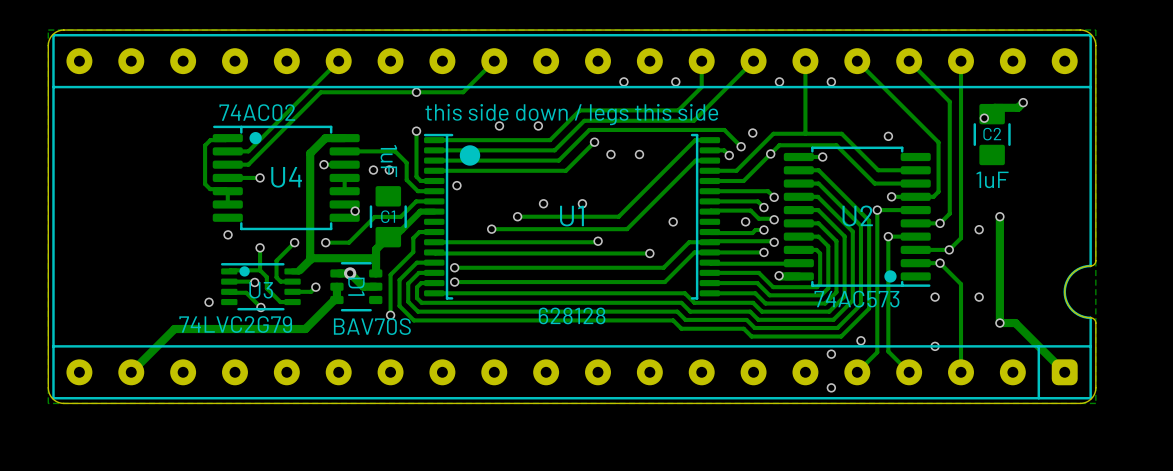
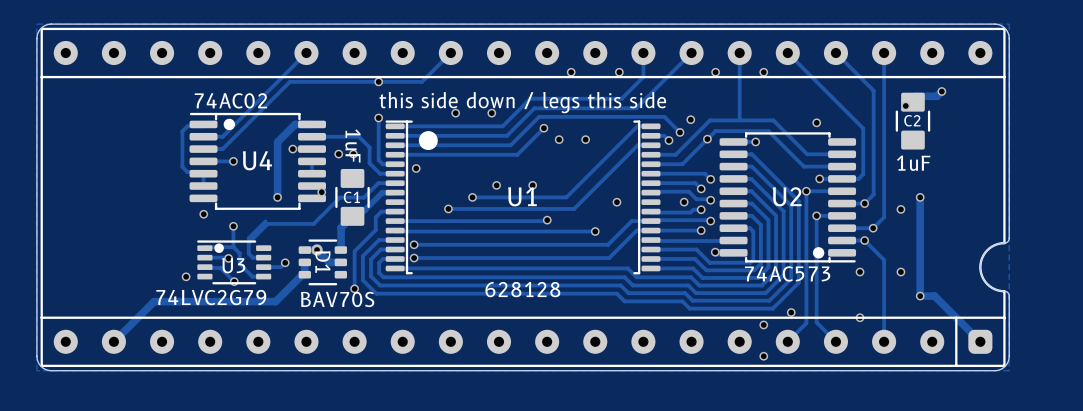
track: (326, 138) (310, 153) (310, 259) (298, 271) -> (295, 124) (277, 142) (277, 197)
via: none -> (277, 197)
via: (294, 242) -> none
via: (325, 242) -> none
track: (349, 242) (325, 242) -> (316, 221) (313, 223) (267, 223) (248, 242)
track: (376, 258) (310, 258) -> none

